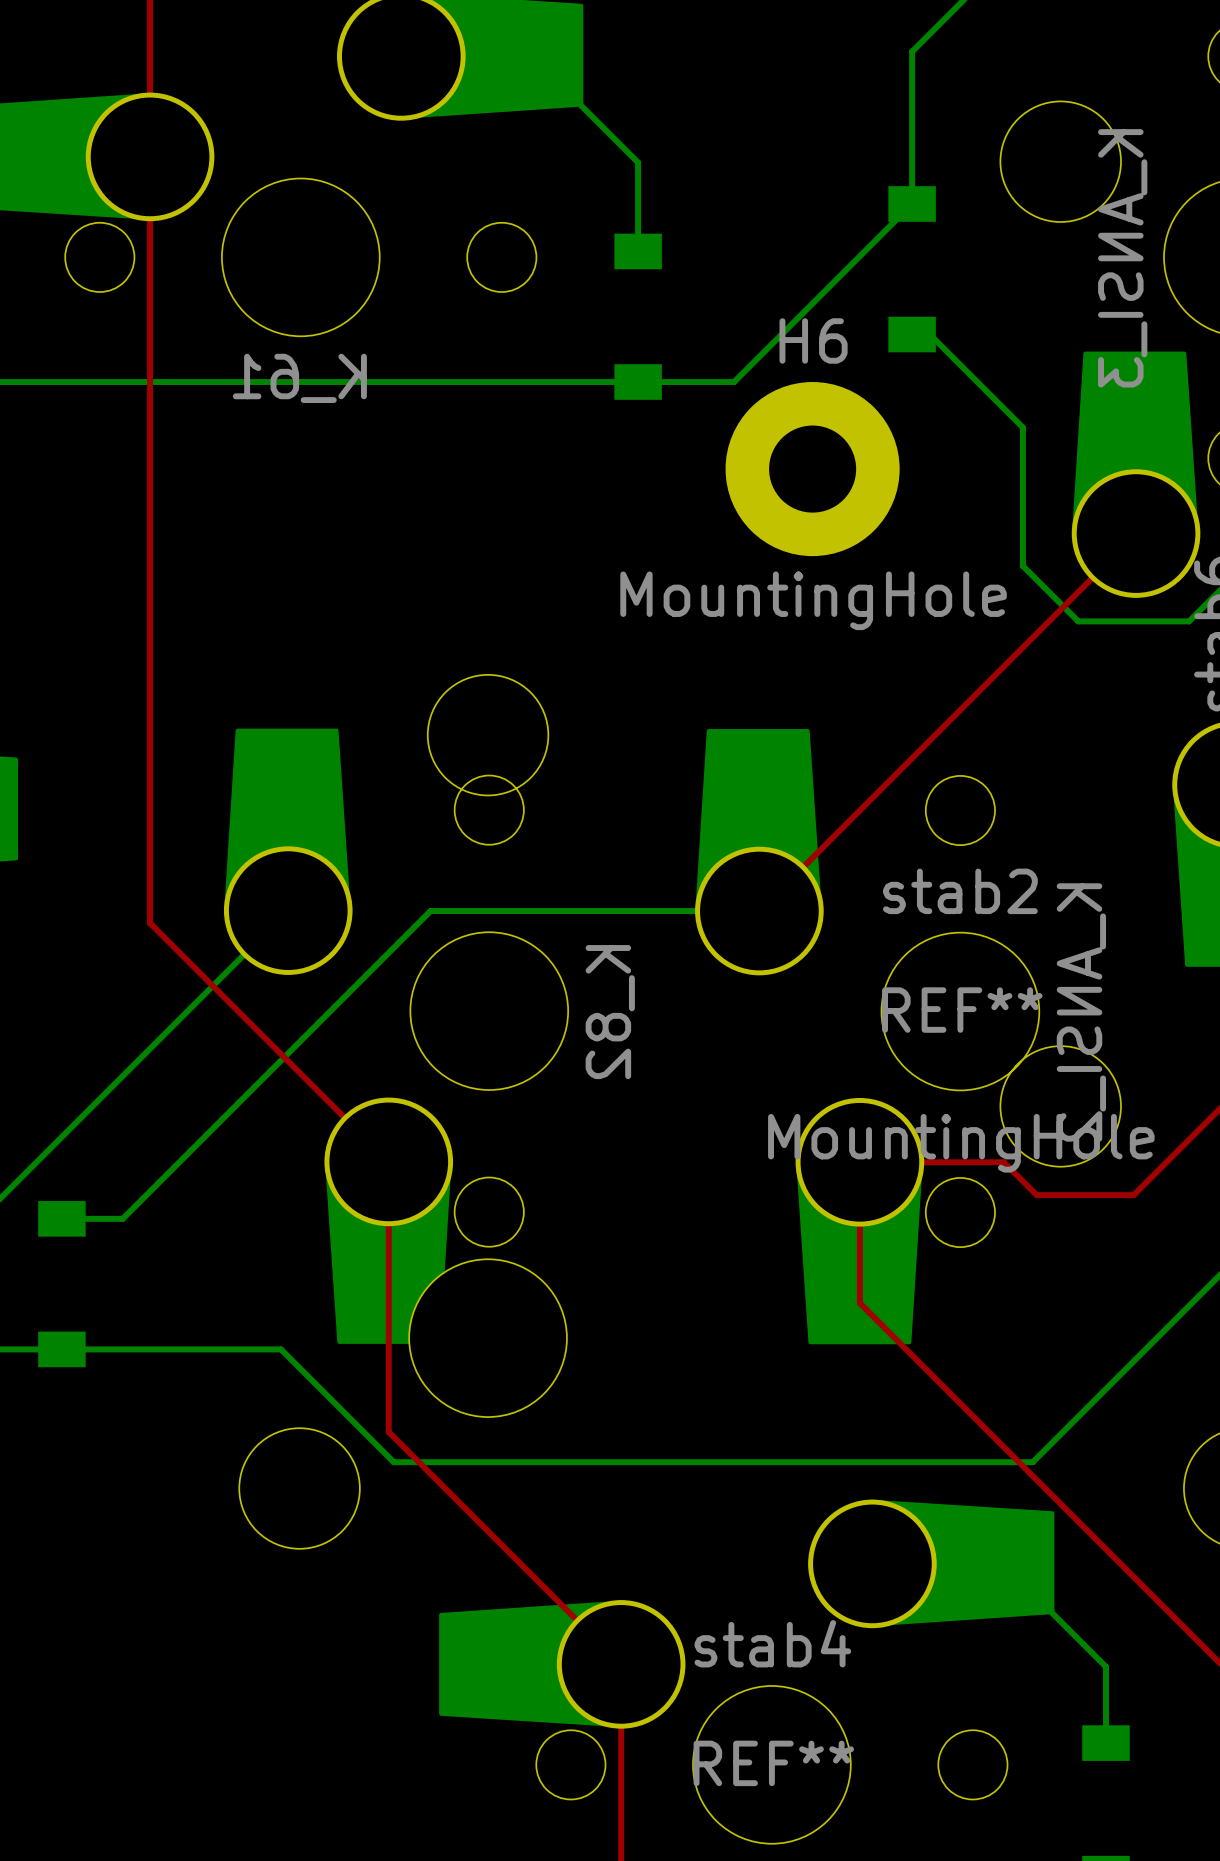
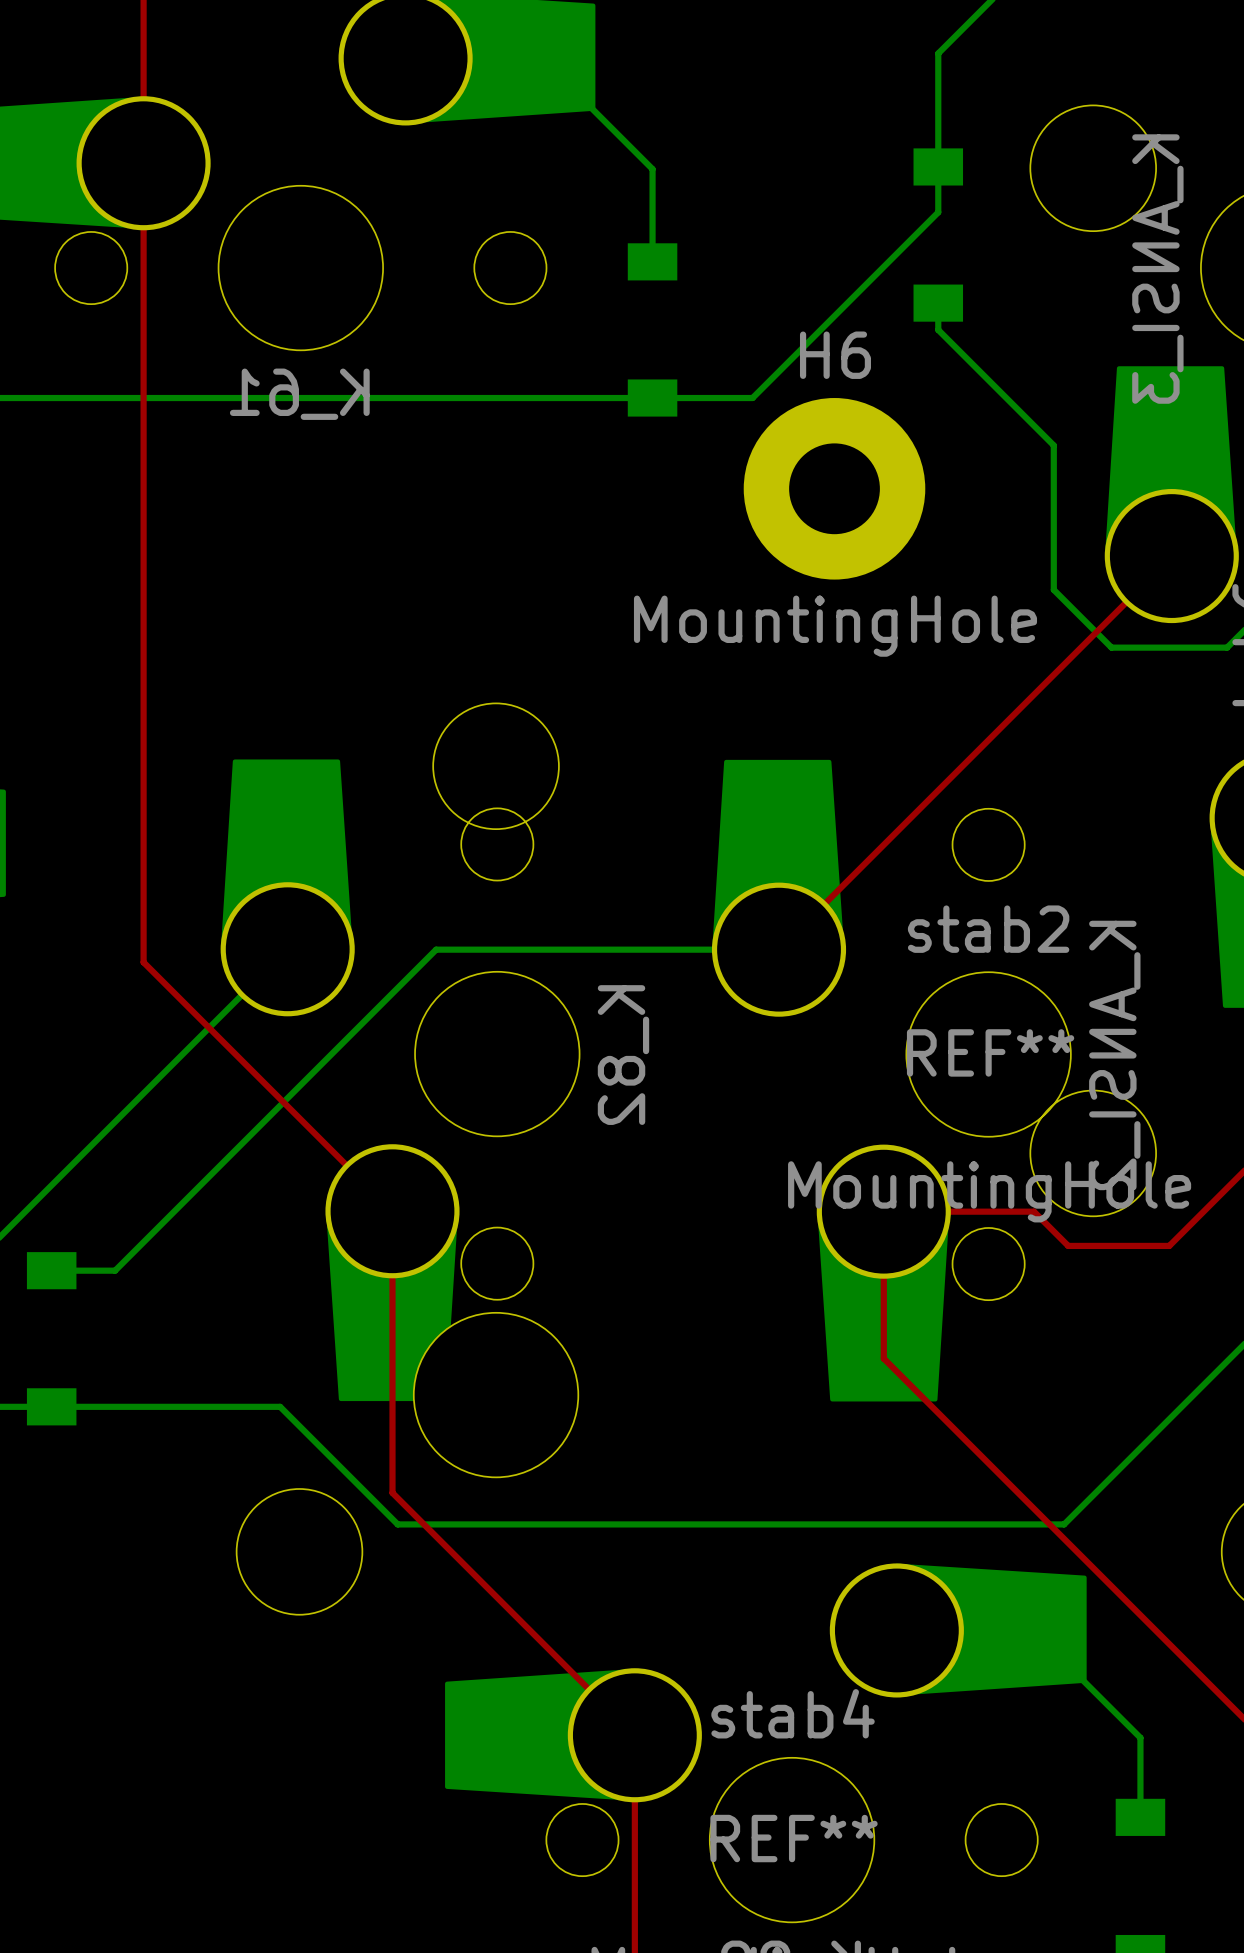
part position: (912, 269) -> (938, 235)
bottom track: none -> (938, 303) (938, 329) (956, 348)

